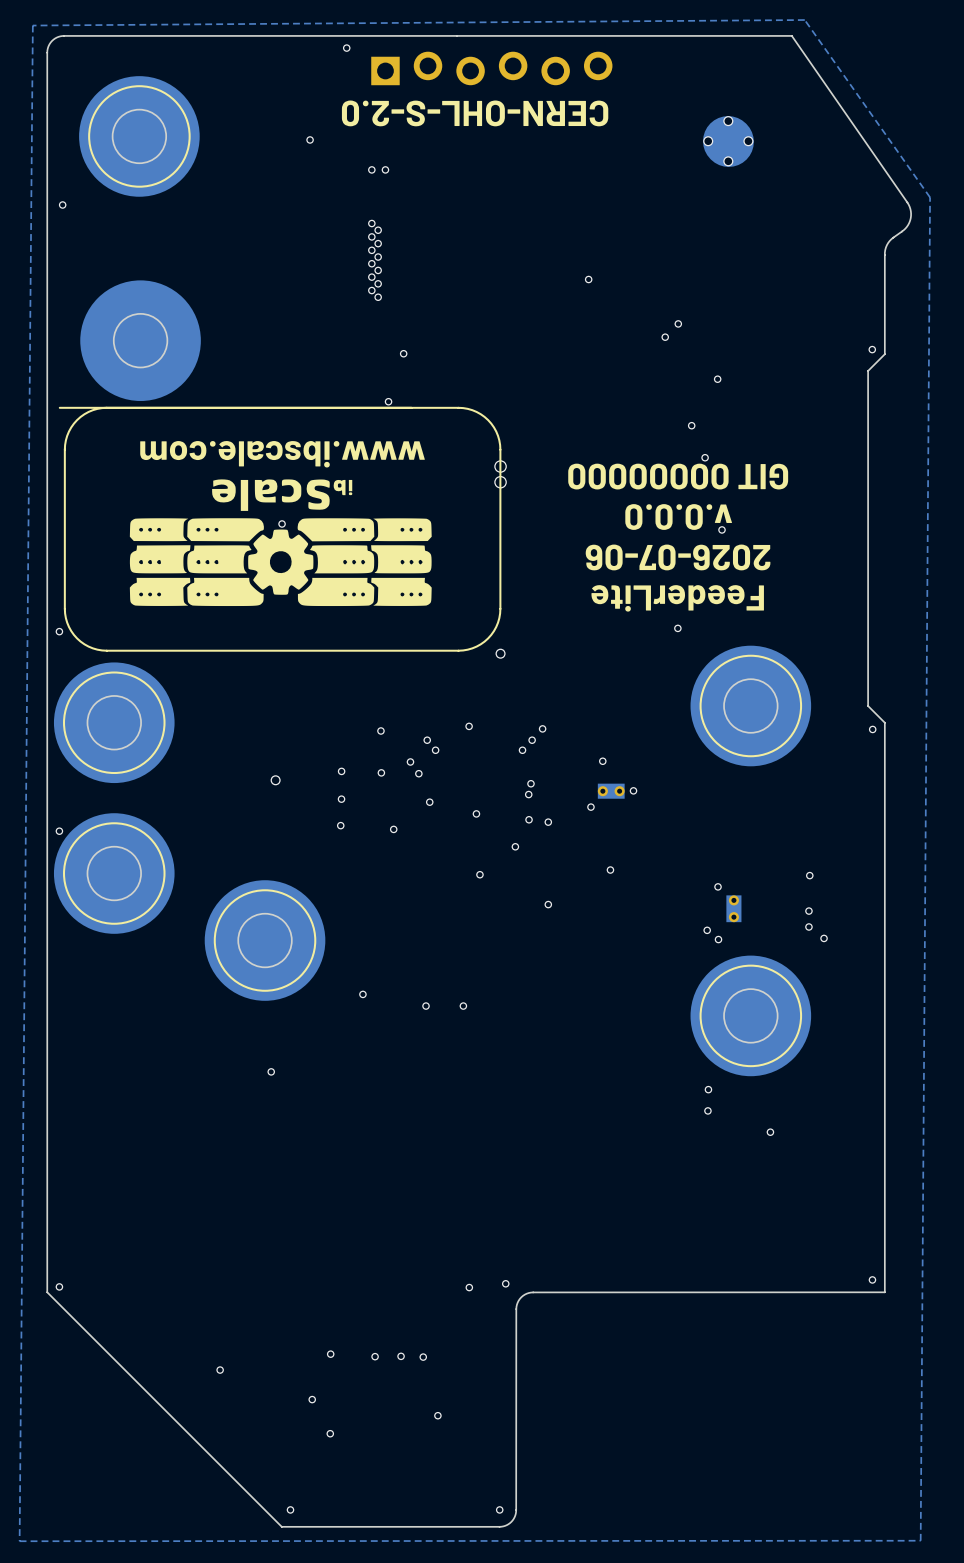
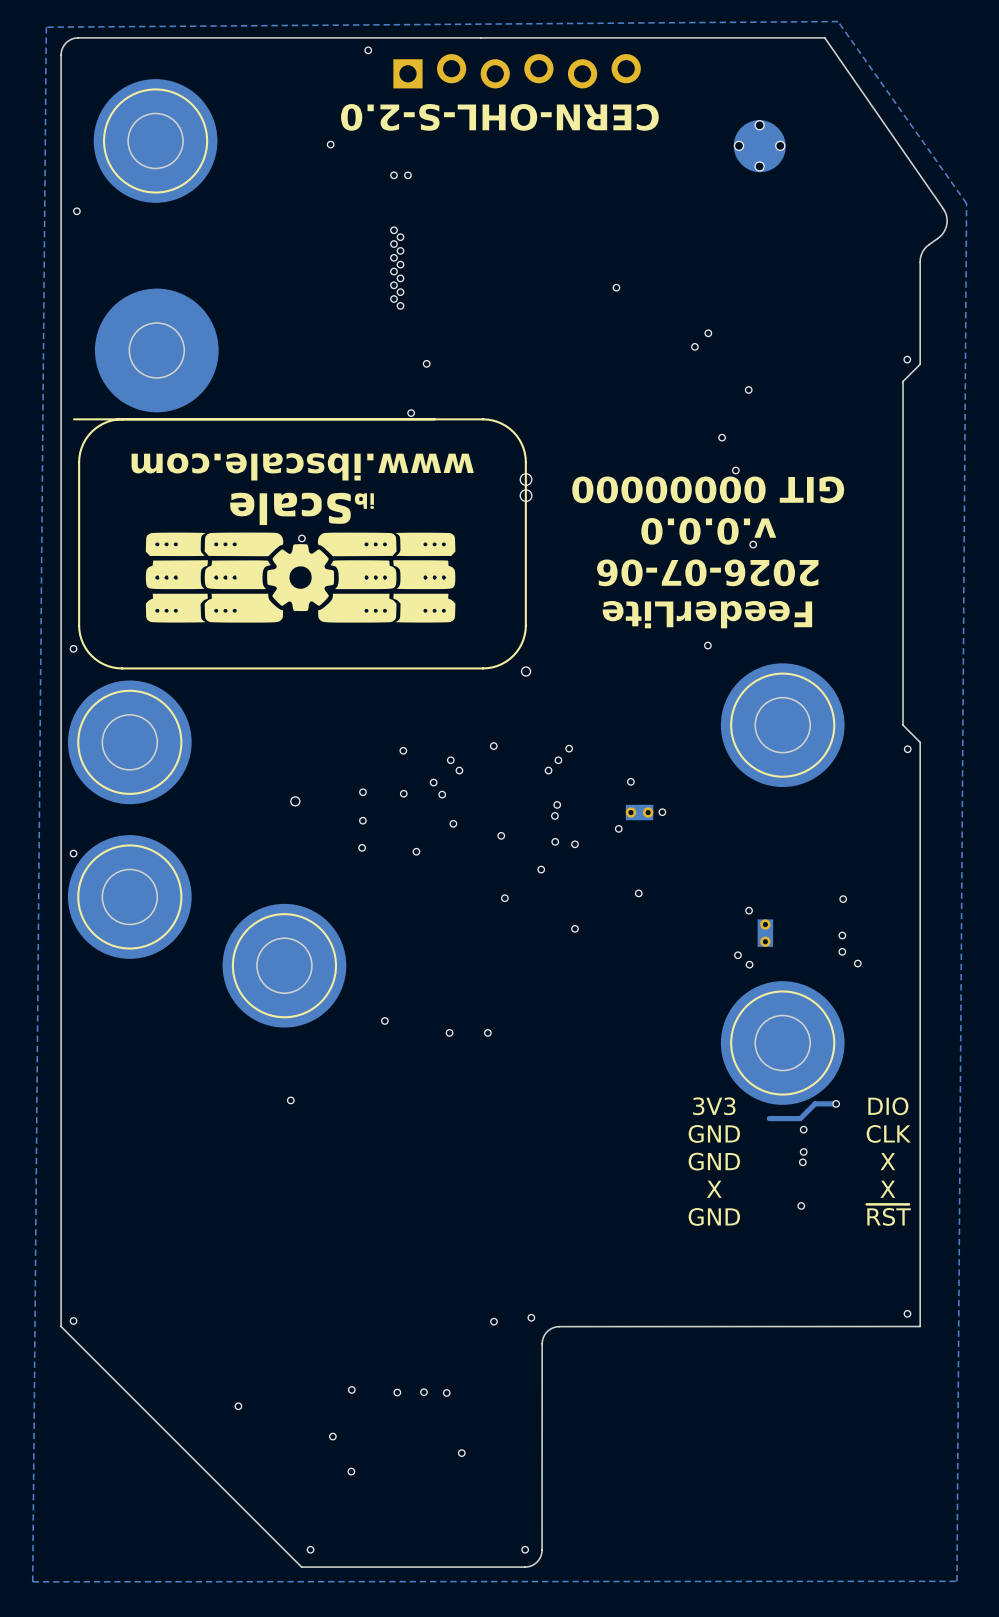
track: none -> (836, 1103) (815, 1103) (800, 1118) (769, 1118)
via: none -> (836, 1103)
text: none -> 3V3 (714, 1106)
text: none -> DIO (888, 1106)
via: (708, 1089) -> none
via: none -> (803, 1129)
text: none -> GND (714, 1133)
text: none -> CLK (888, 1133)
via: (707, 1110) -> none
via: none -> (803, 1151)
text: none -> GND (714, 1161)
text: none -> X (887, 1161)
text: none -> X (714, 1189)
text: none -> X (887, 1189)
via: none -> (801, 1205)
text: none -> ~{RST} (888, 1215)
text: none -> GND (714, 1216)

